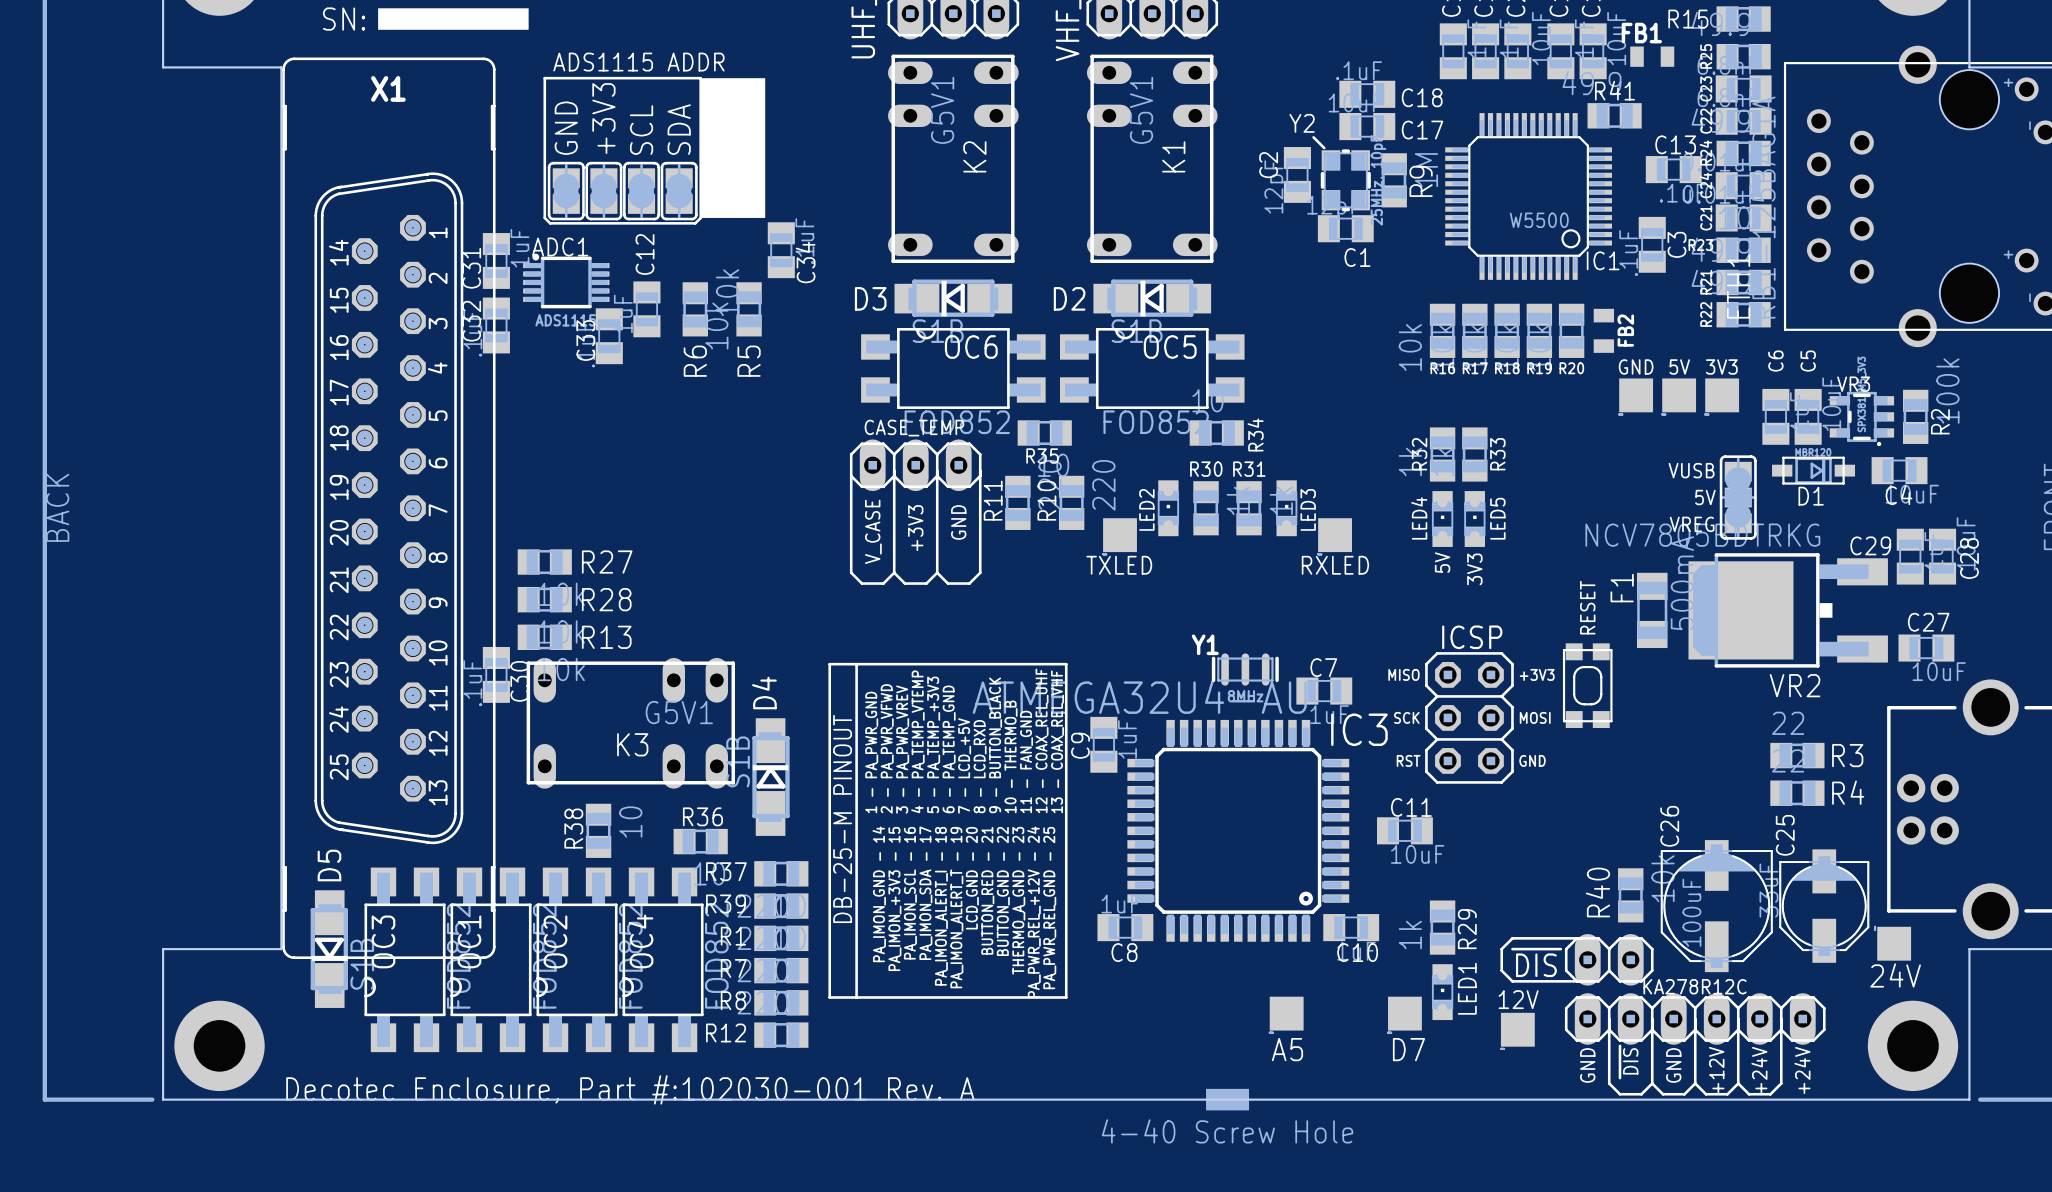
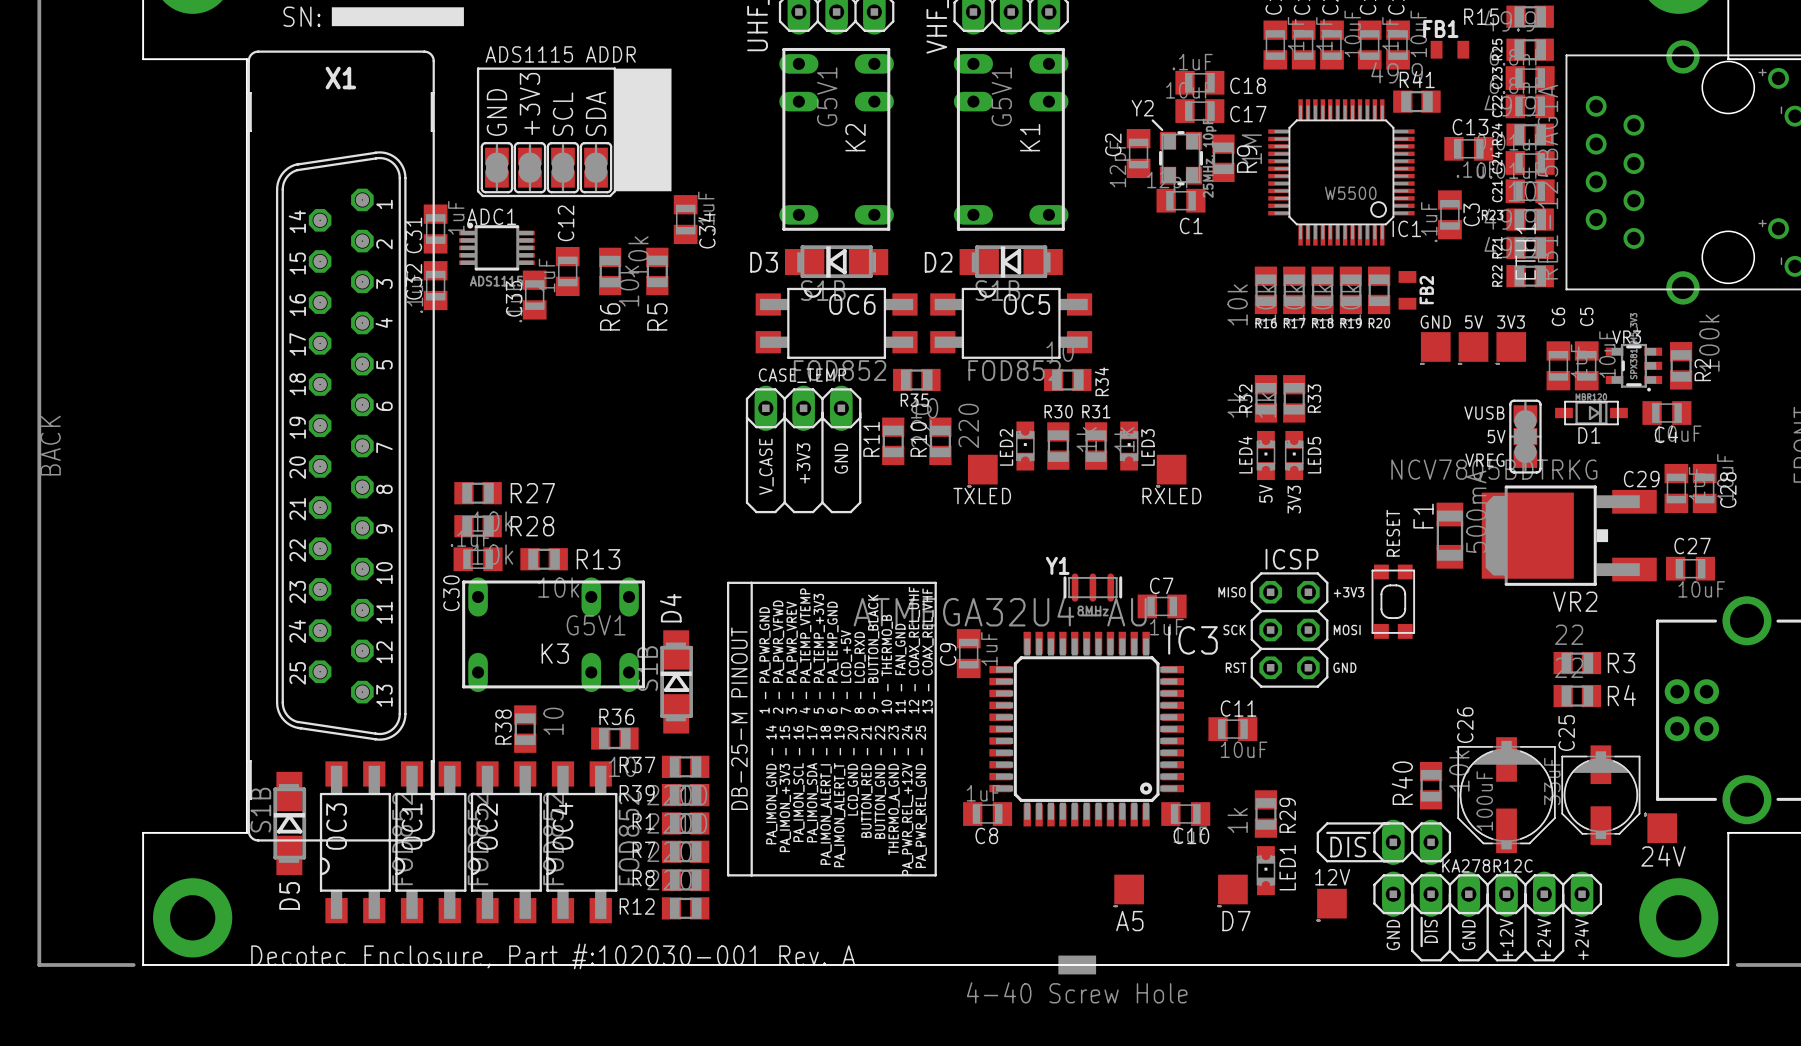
R13 position: (544, 637) -> (544, 559)
C30 rotation: 0° (496, 674) -> 90° clockwise (478, 559)
C30 position: (496, 674) -> (478, 559)
D5 rotation: 0° (329, 949) -> 180° (289, 823)

